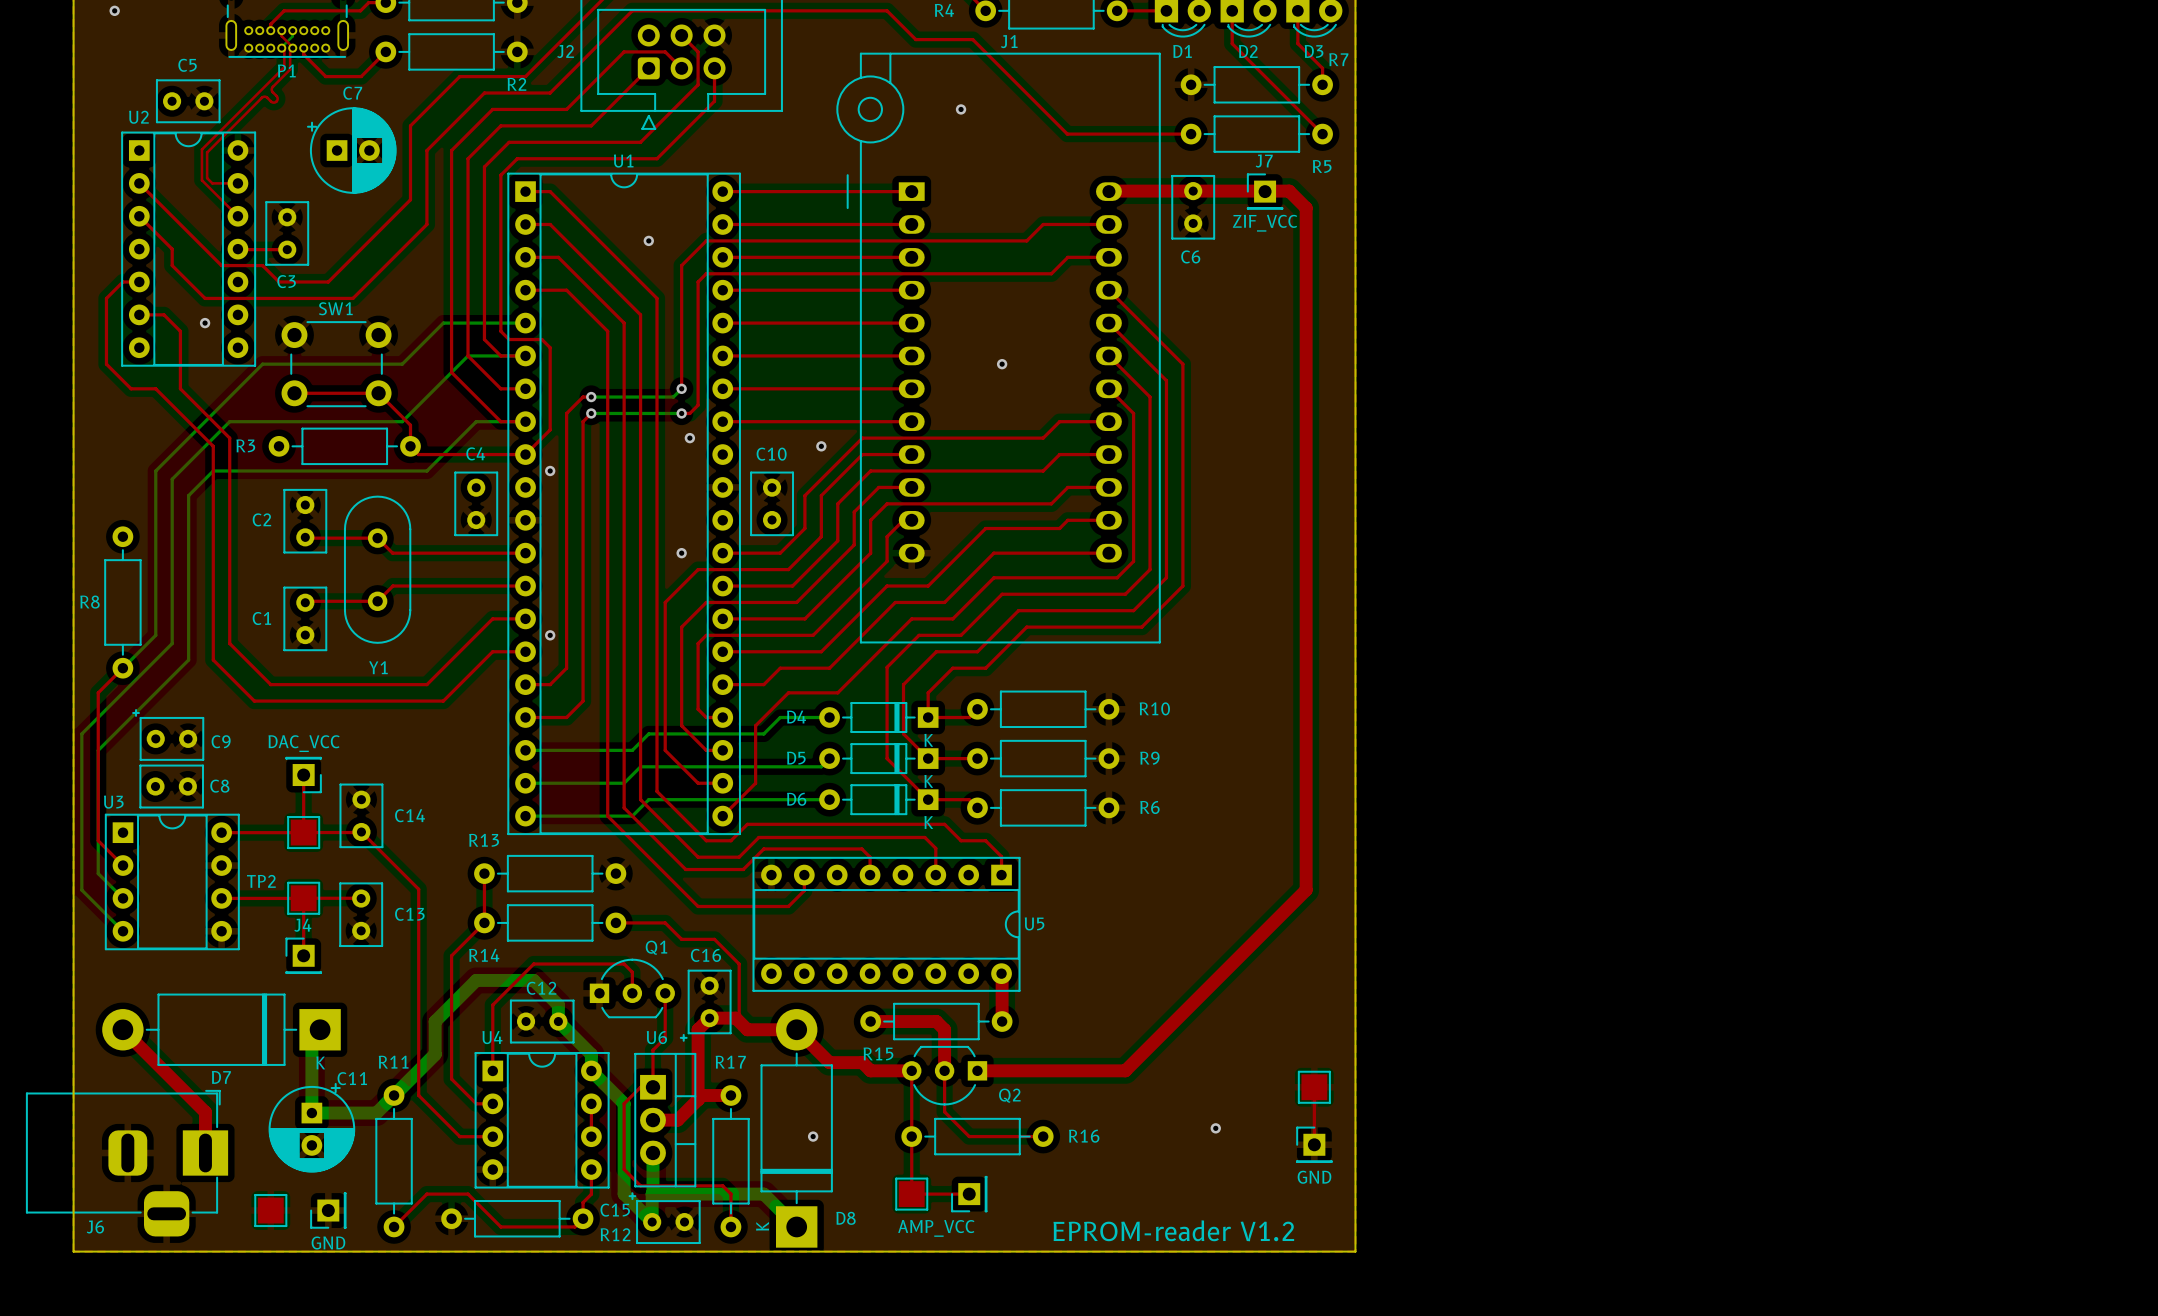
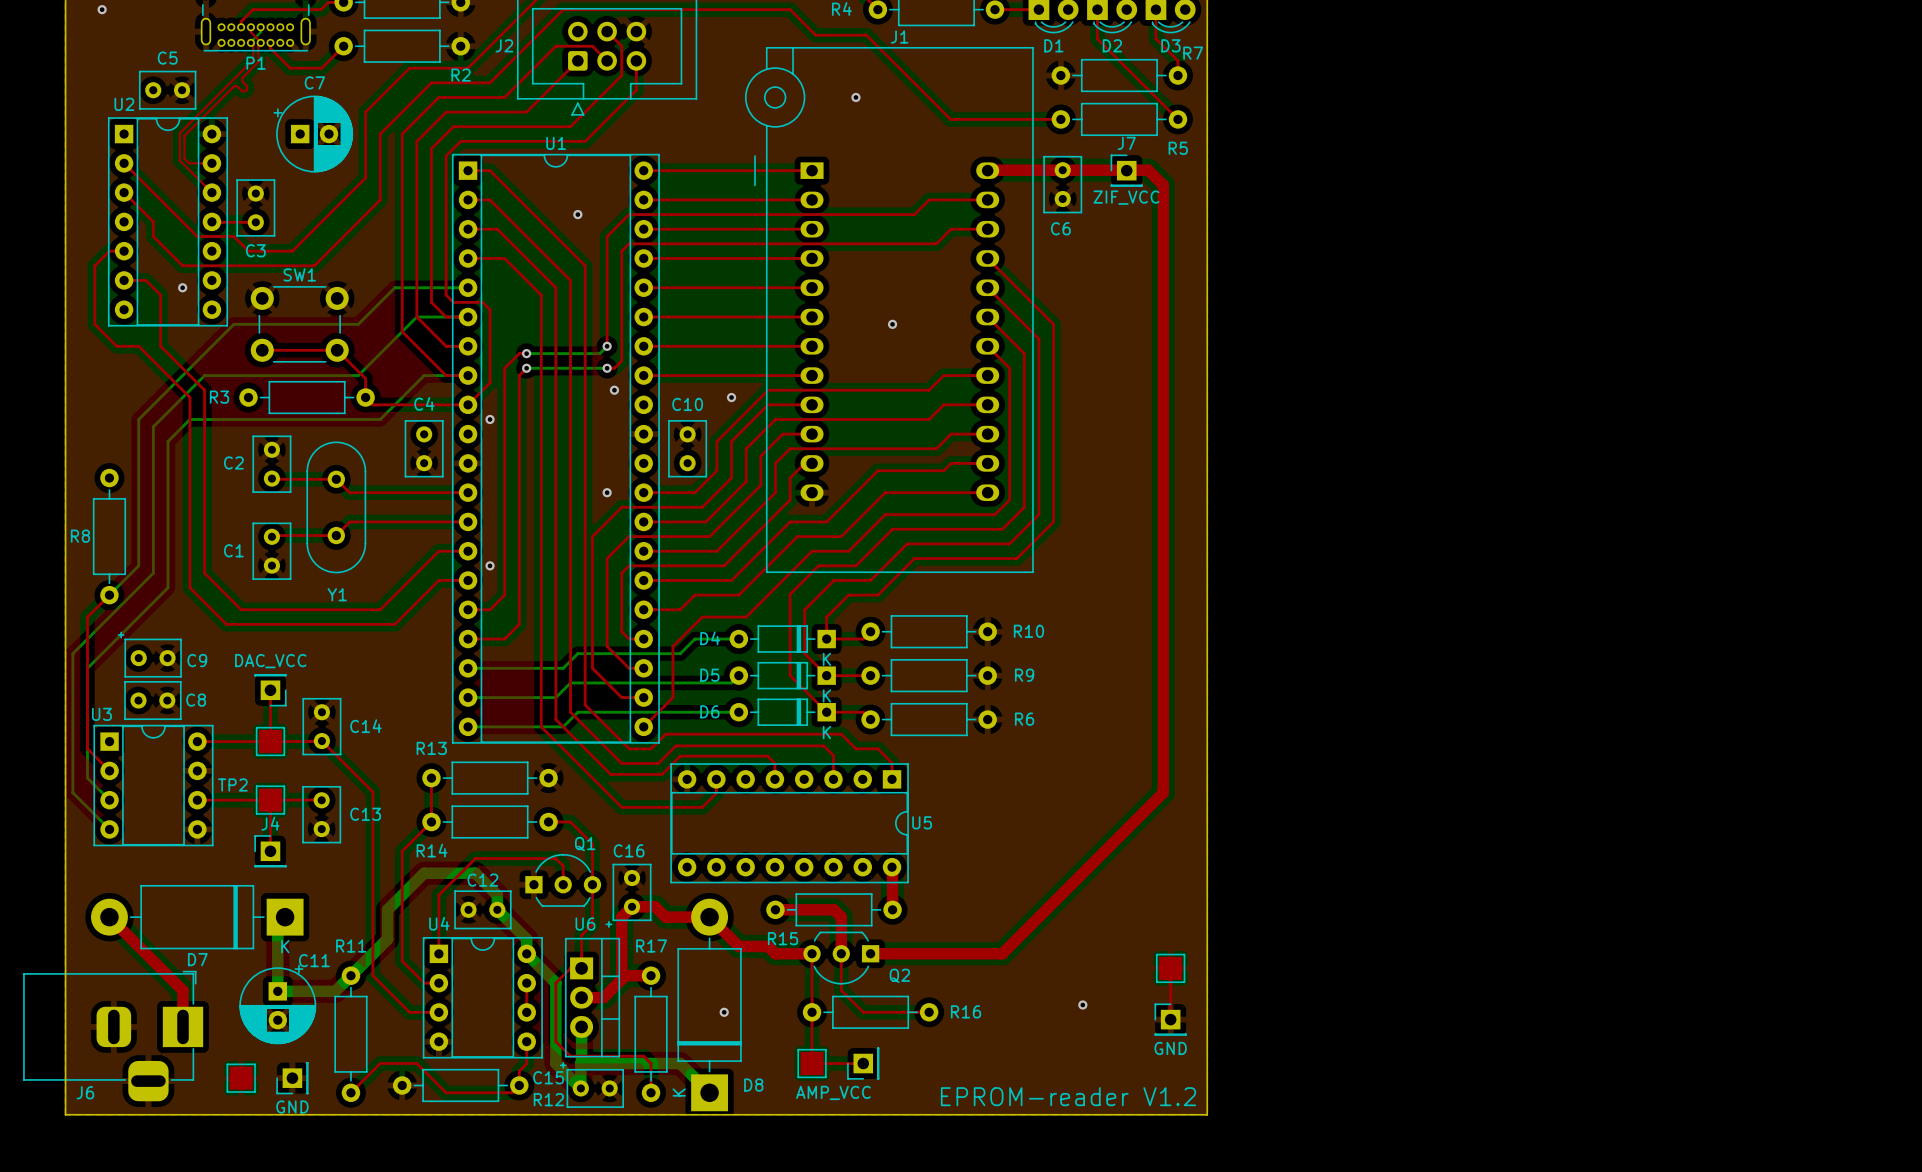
top track: (640, 922) (665, 922) (681, 939) (714, 939) (739, 964) (739, 1014) (735, 1018) -> (570, 822) (592, 843) (592, 884)

